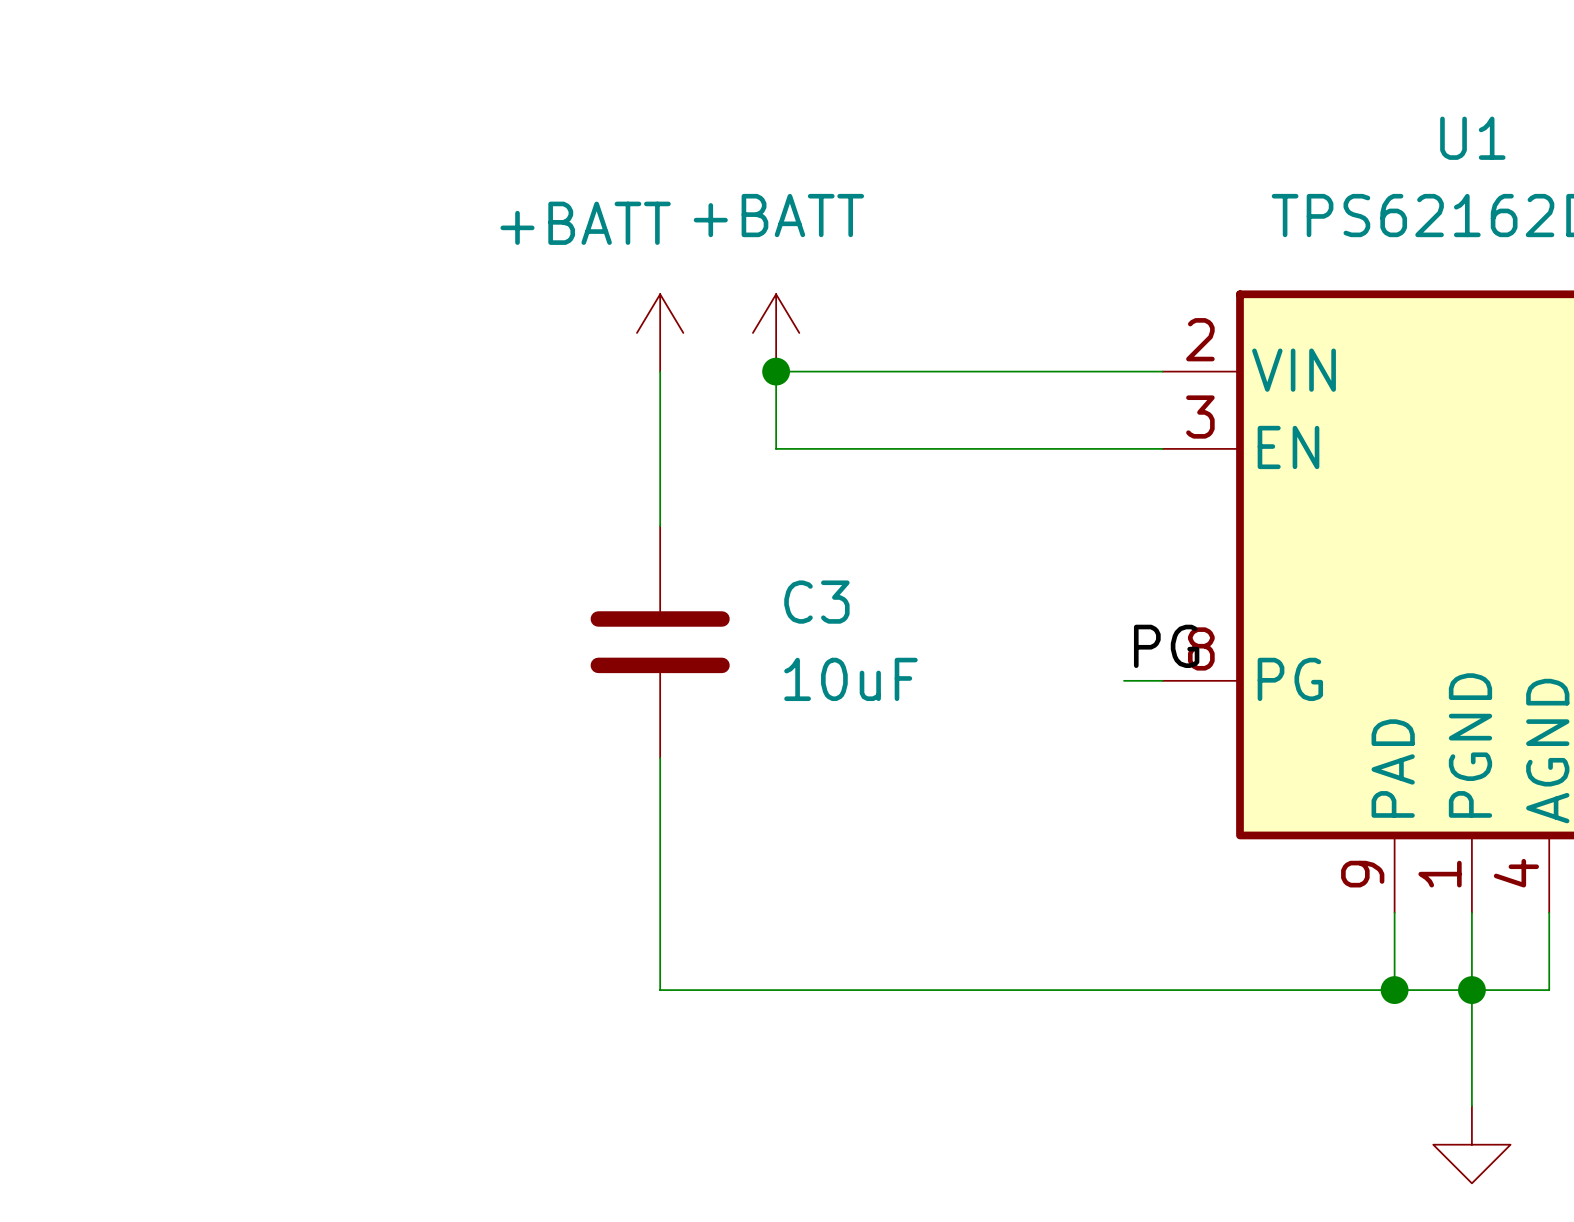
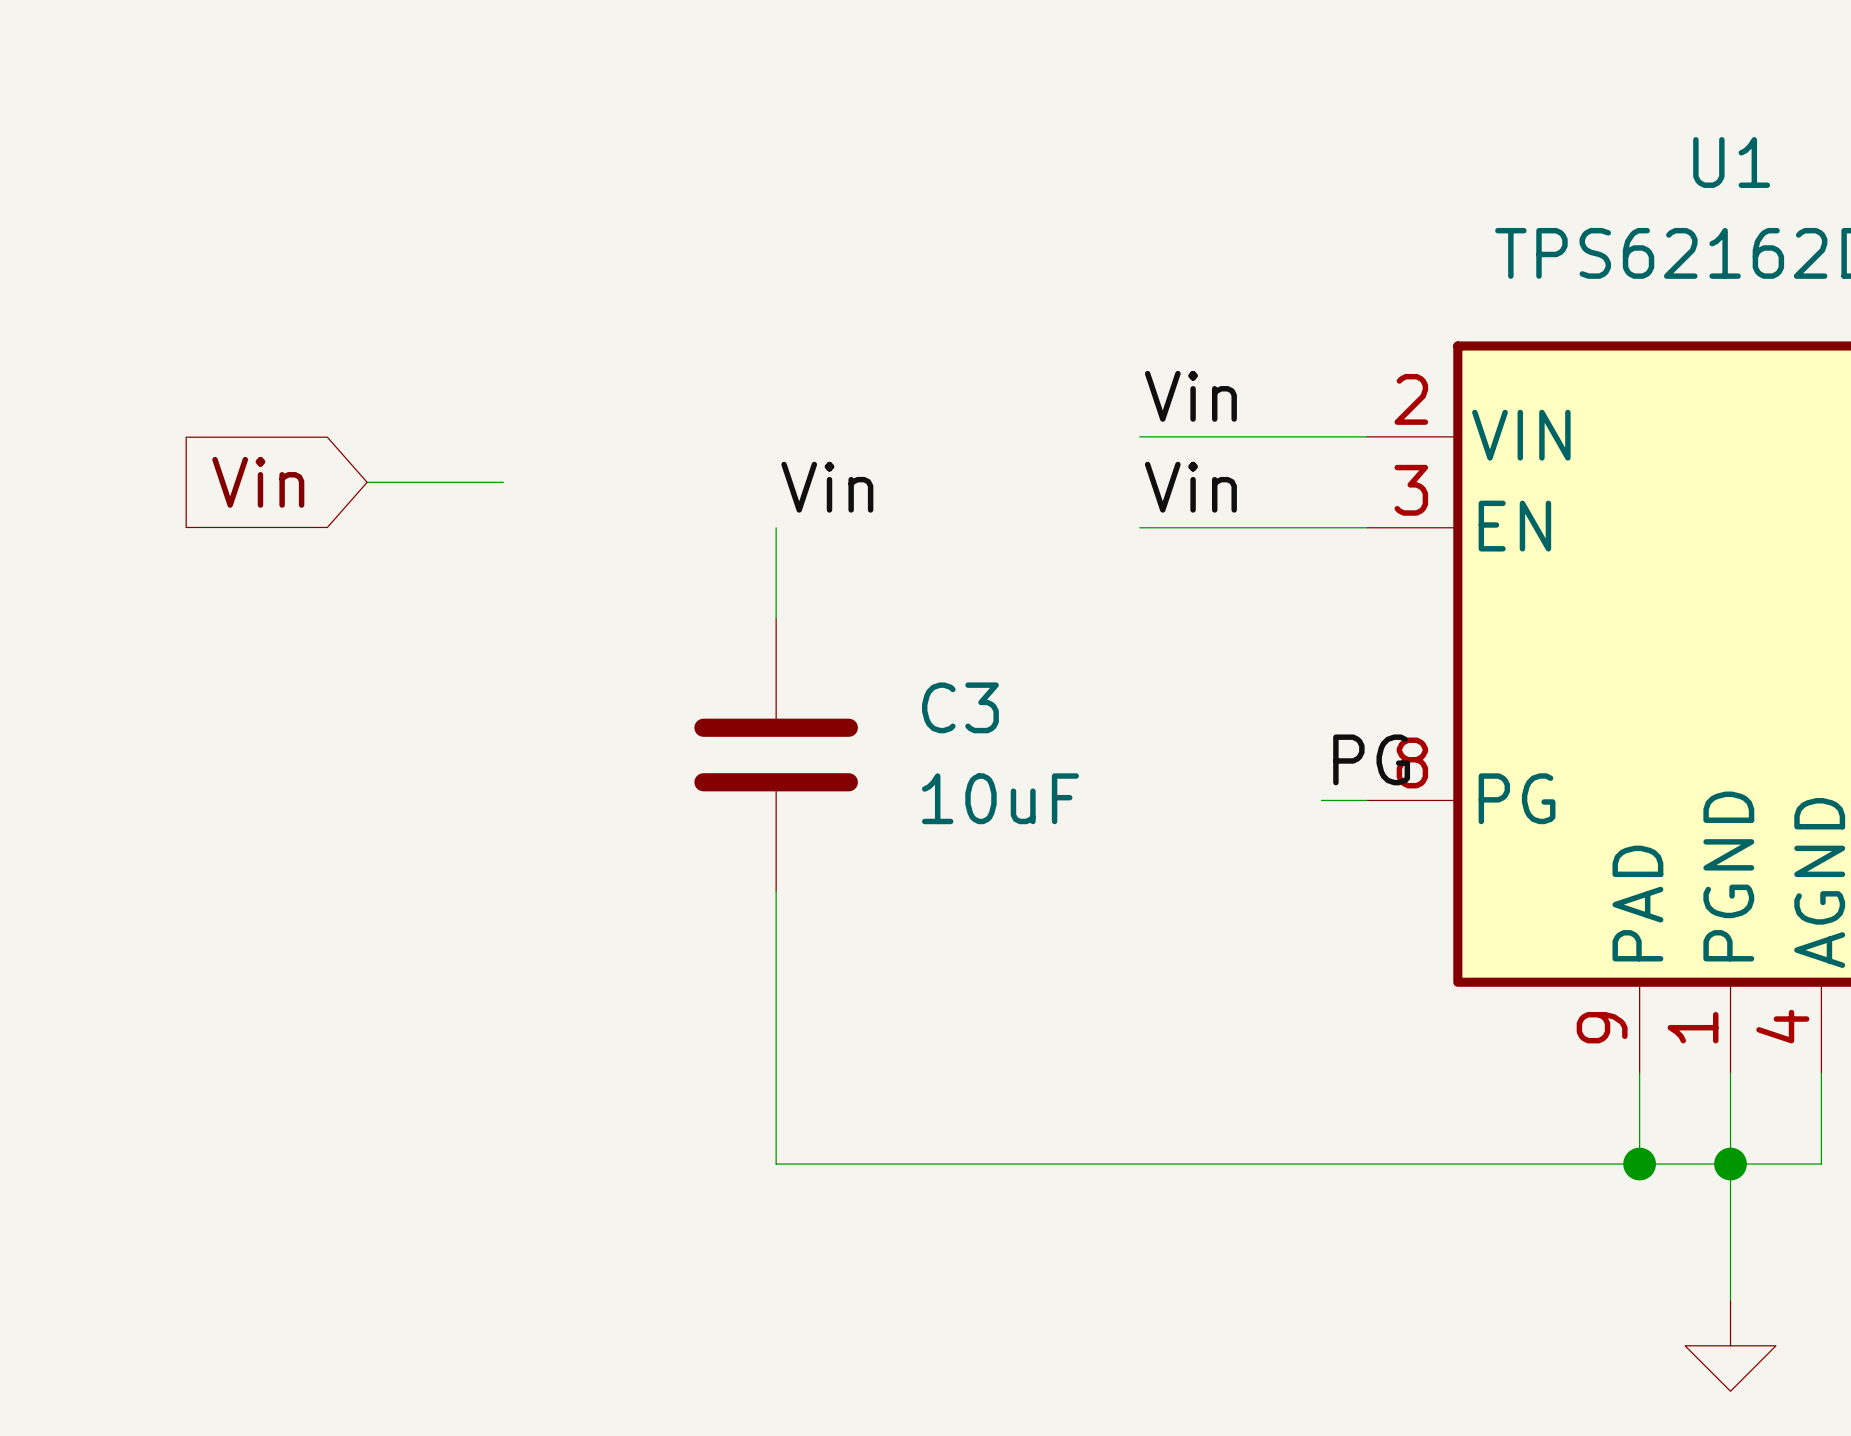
power symbol: +BATT (660, 332) -> none
power symbol: +BATT (776, 332) -> none
label: none -> Vin (1190, 396)
wire: (660, 371) (660, 448) -> none
junction: (776, 371) -> none
wire: (969, 371) (776, 371) (776, 448) (969, 448) -> none
global label: none -> Vin (258, 482)
wire: none -> (367, 482) (503, 482)
label: none -> Vin (827, 487)
label: none -> Vin (1190, 487)

